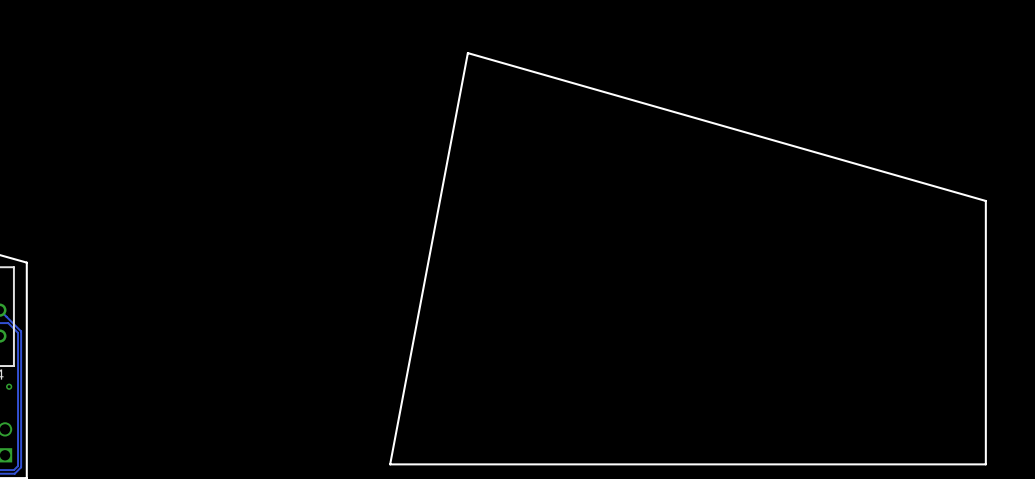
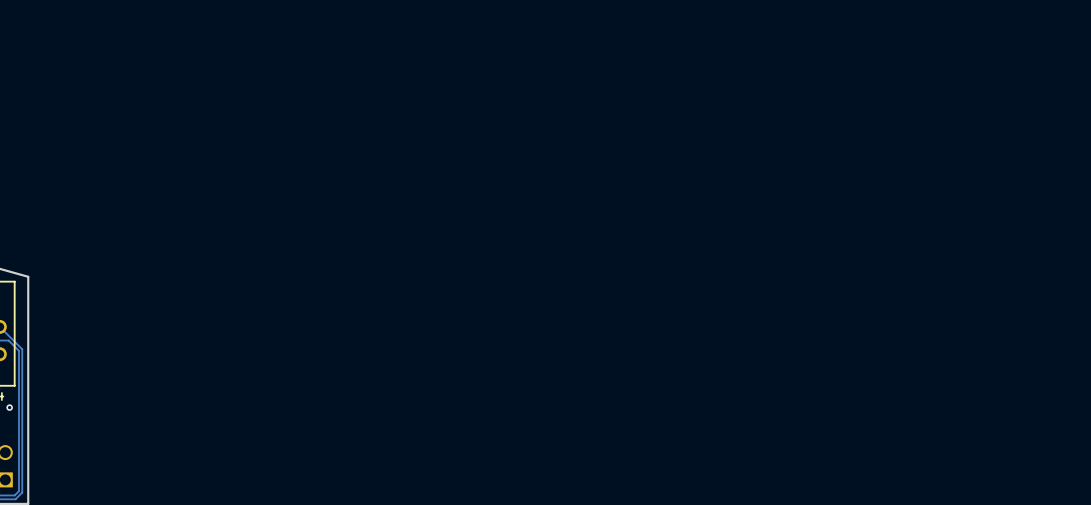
board edge: (467, 53) (985, 200) (985, 464) (390, 464) (467, 53) -> none

